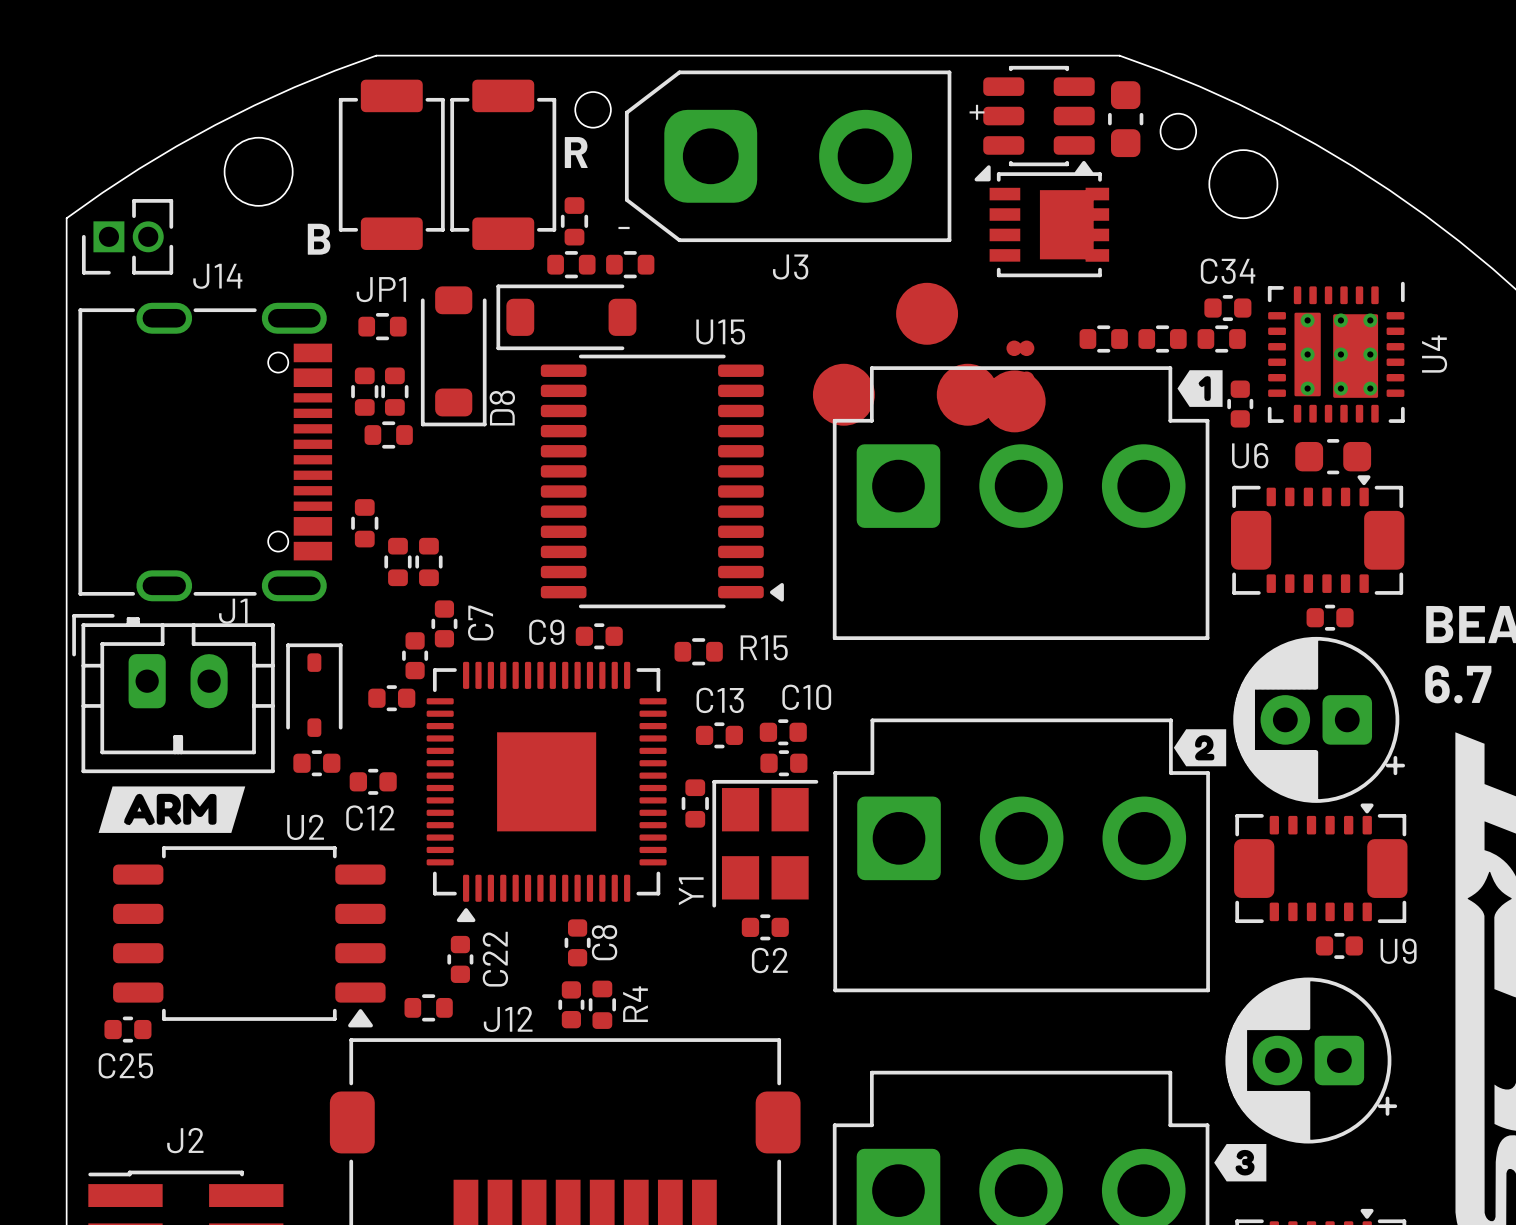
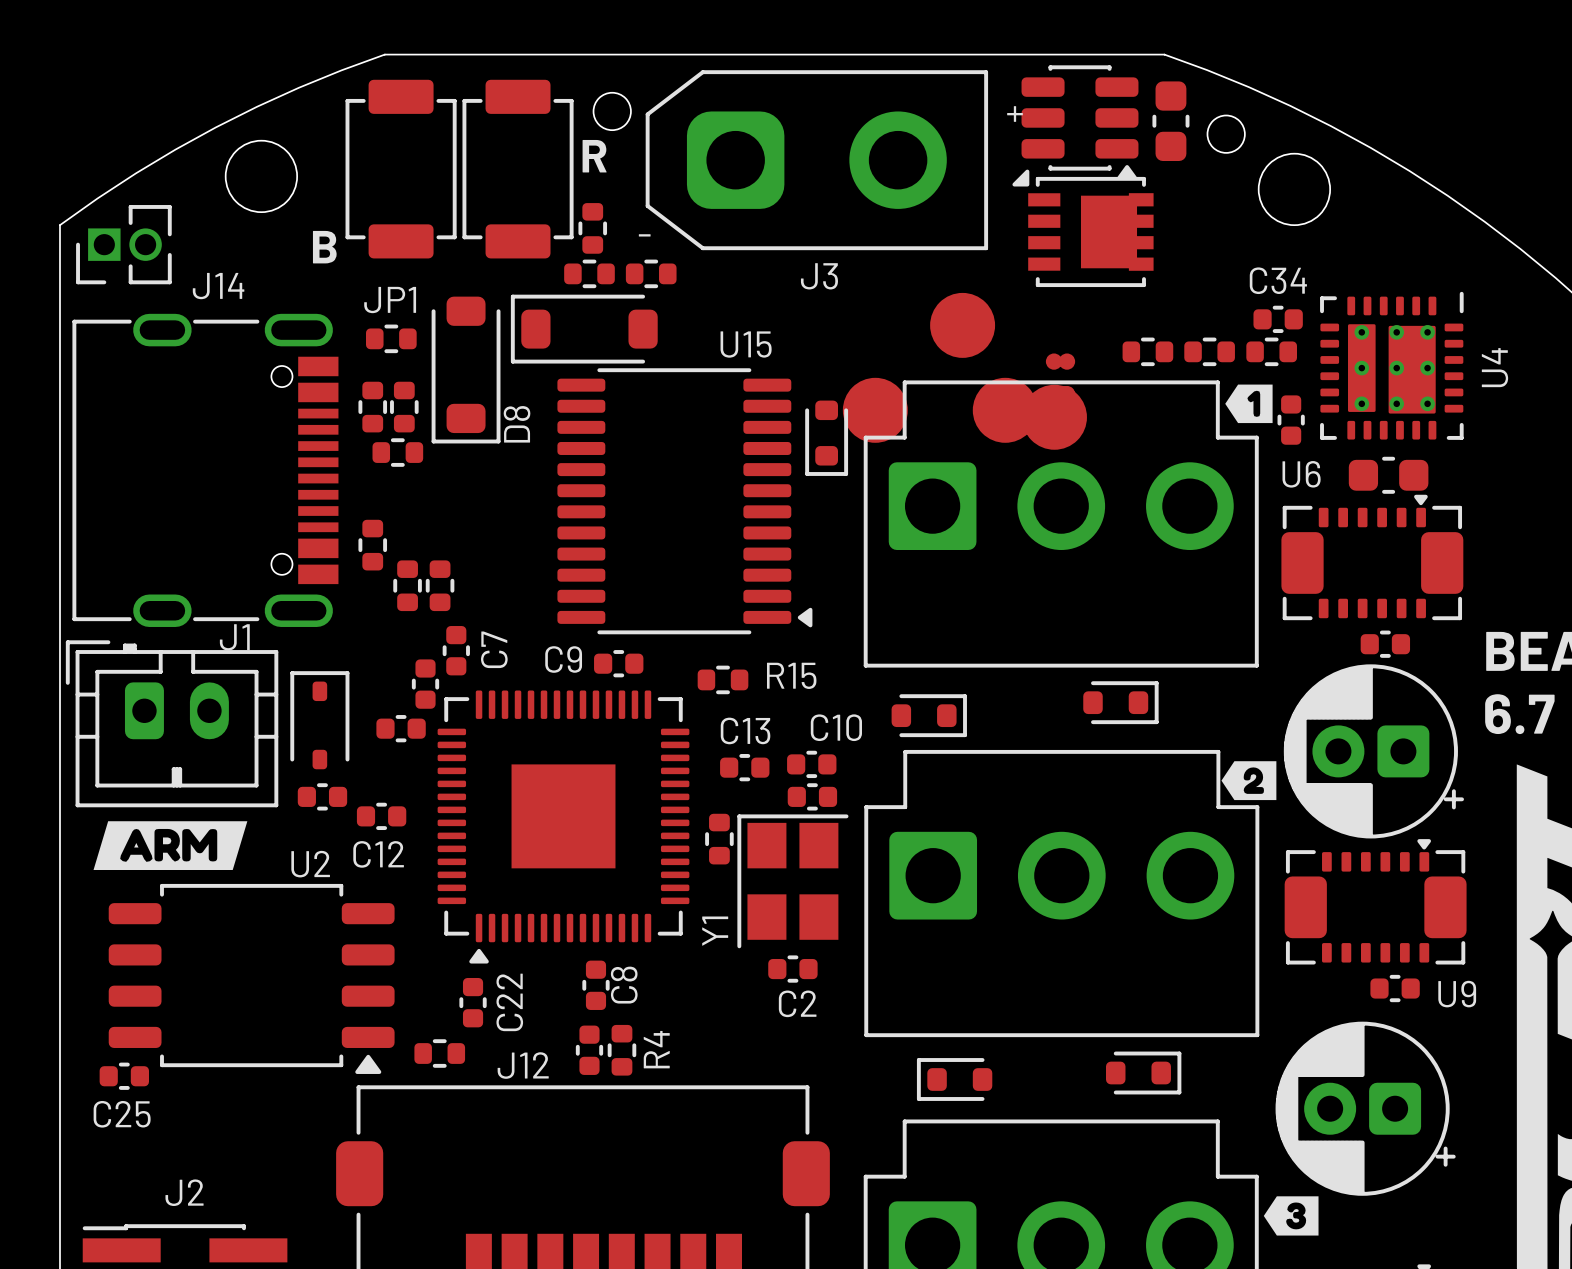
part: none -> (826, 438)
part: none -> (1120, 702)
part: none -> (929, 715)
part: none -> (1143, 1073)
part: none -> (954, 1079)

